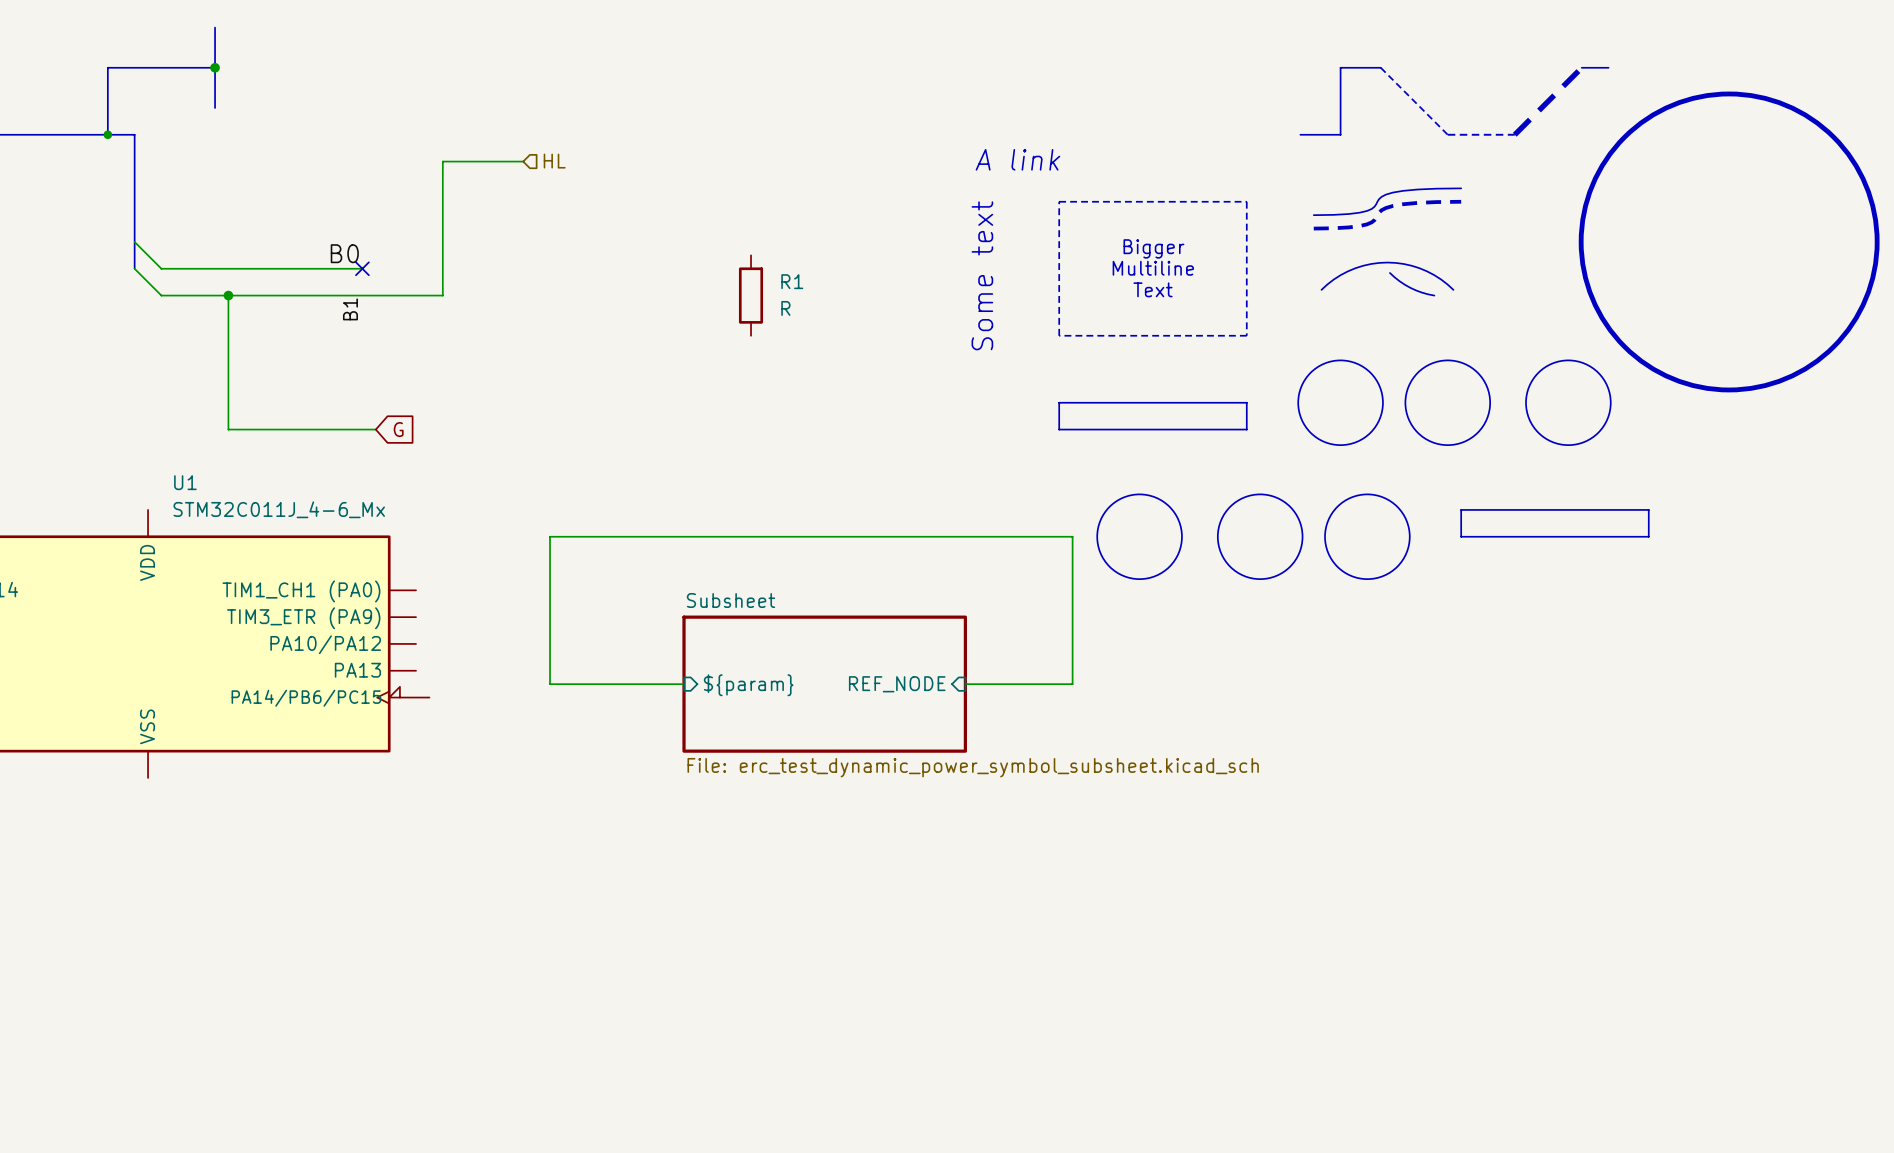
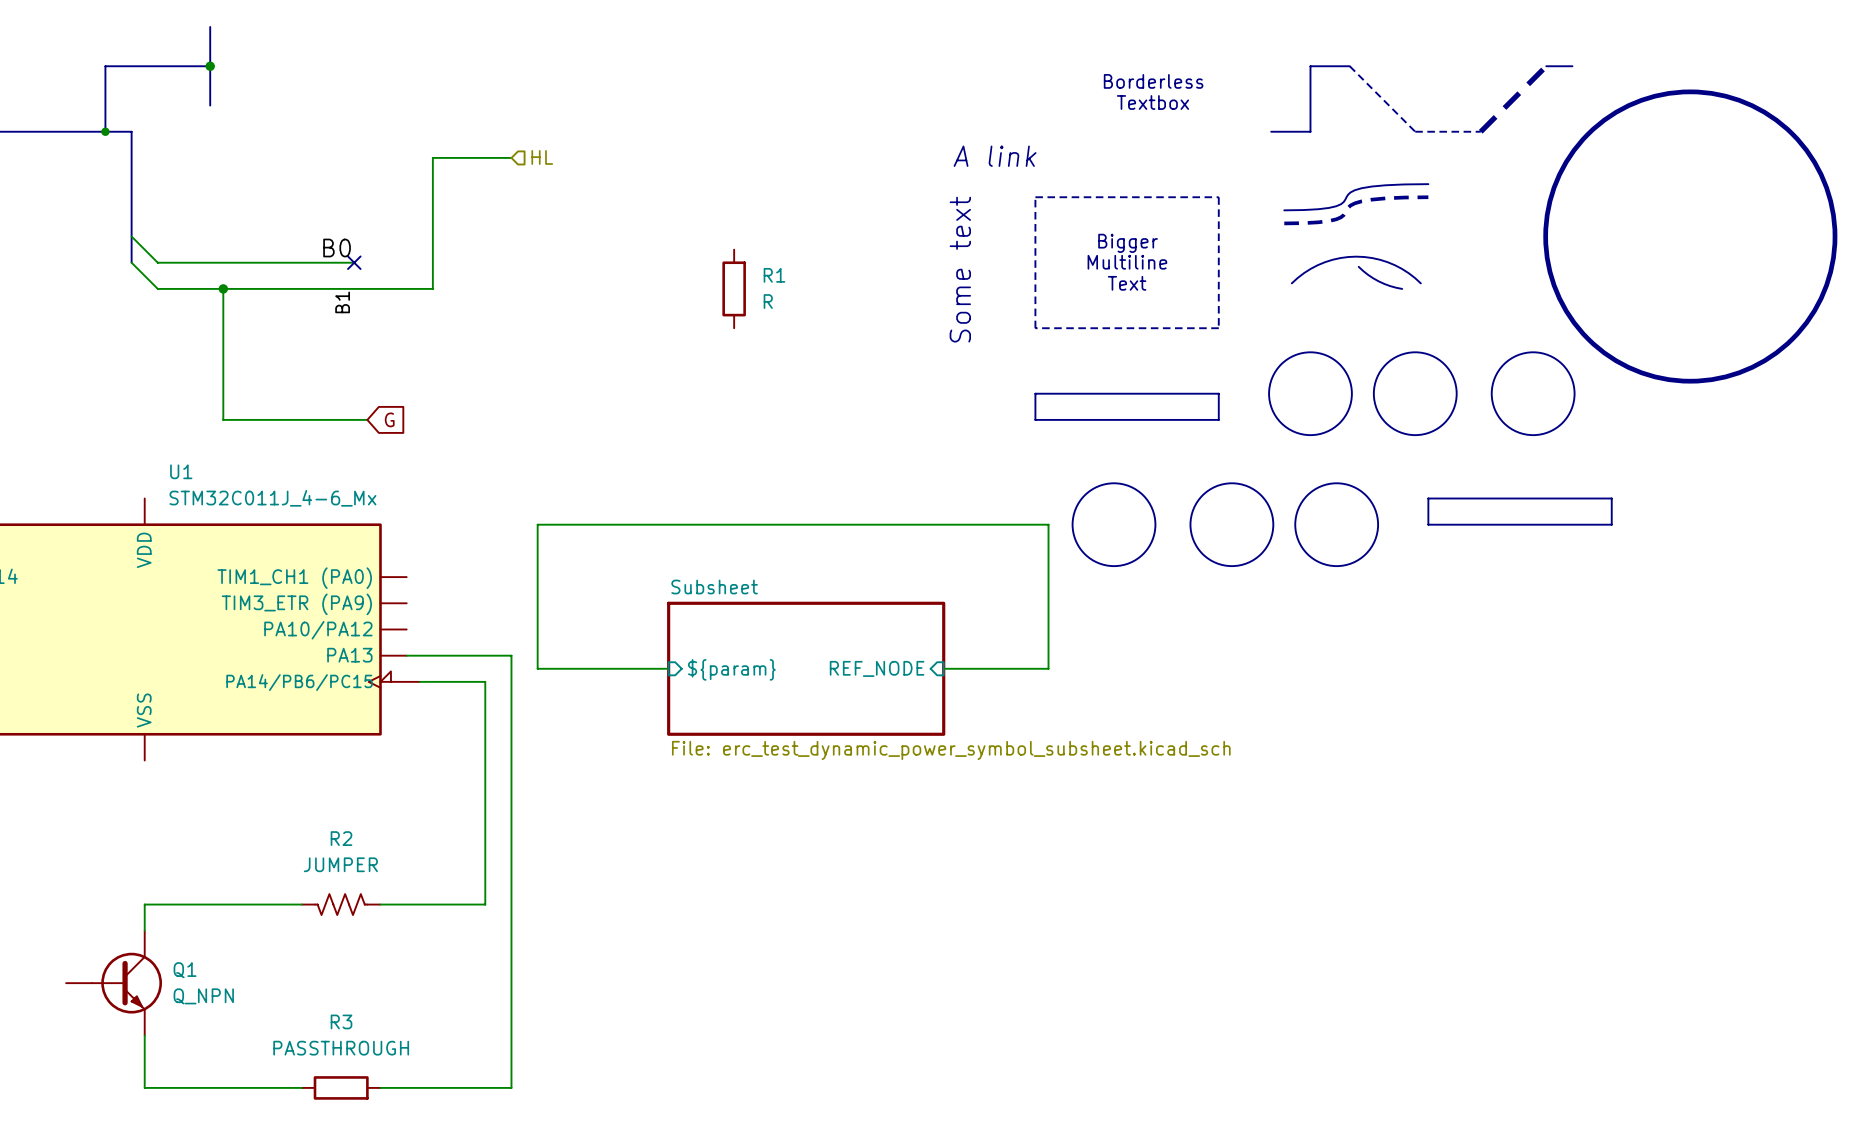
text: none -> Borderless (1153, 81)
text: none -> Textbox (1152, 102)
wire: none -> (406, 655) (511, 655) (511, 1087) (380, 1087)
wire: none -> (419, 681) (485, 681) (485, 904) (380, 904)
wire: none -> (301, 904) (144, 904) (144, 930)
R2: none -> JUMPER (341, 904)
Q1: none -> Q_NPN (114, 983)
wire: none -> (144, 1035) (144, 1087) (301, 1087)
R3: none -> PASSTHROUGH (341, 1087)

